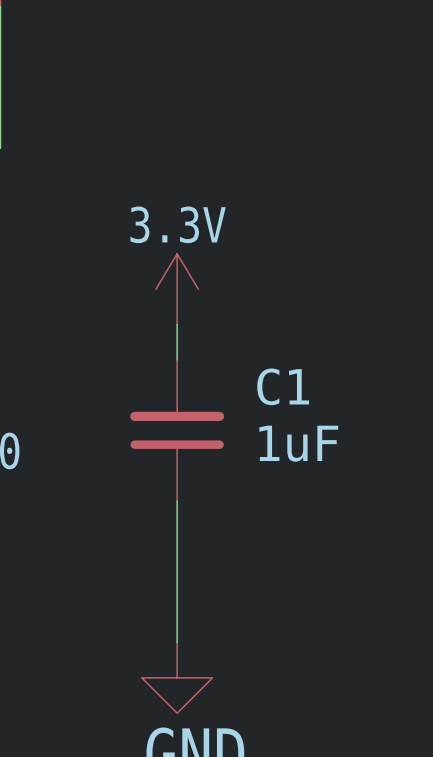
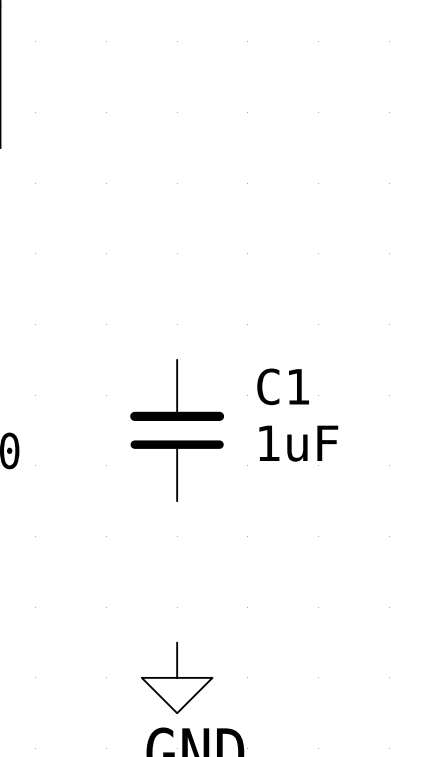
power symbol: 3.3V (177, 289) -> none
wire: (177, 324) (177, 359) -> none
wire: (177, 501) (177, 642) -> none

